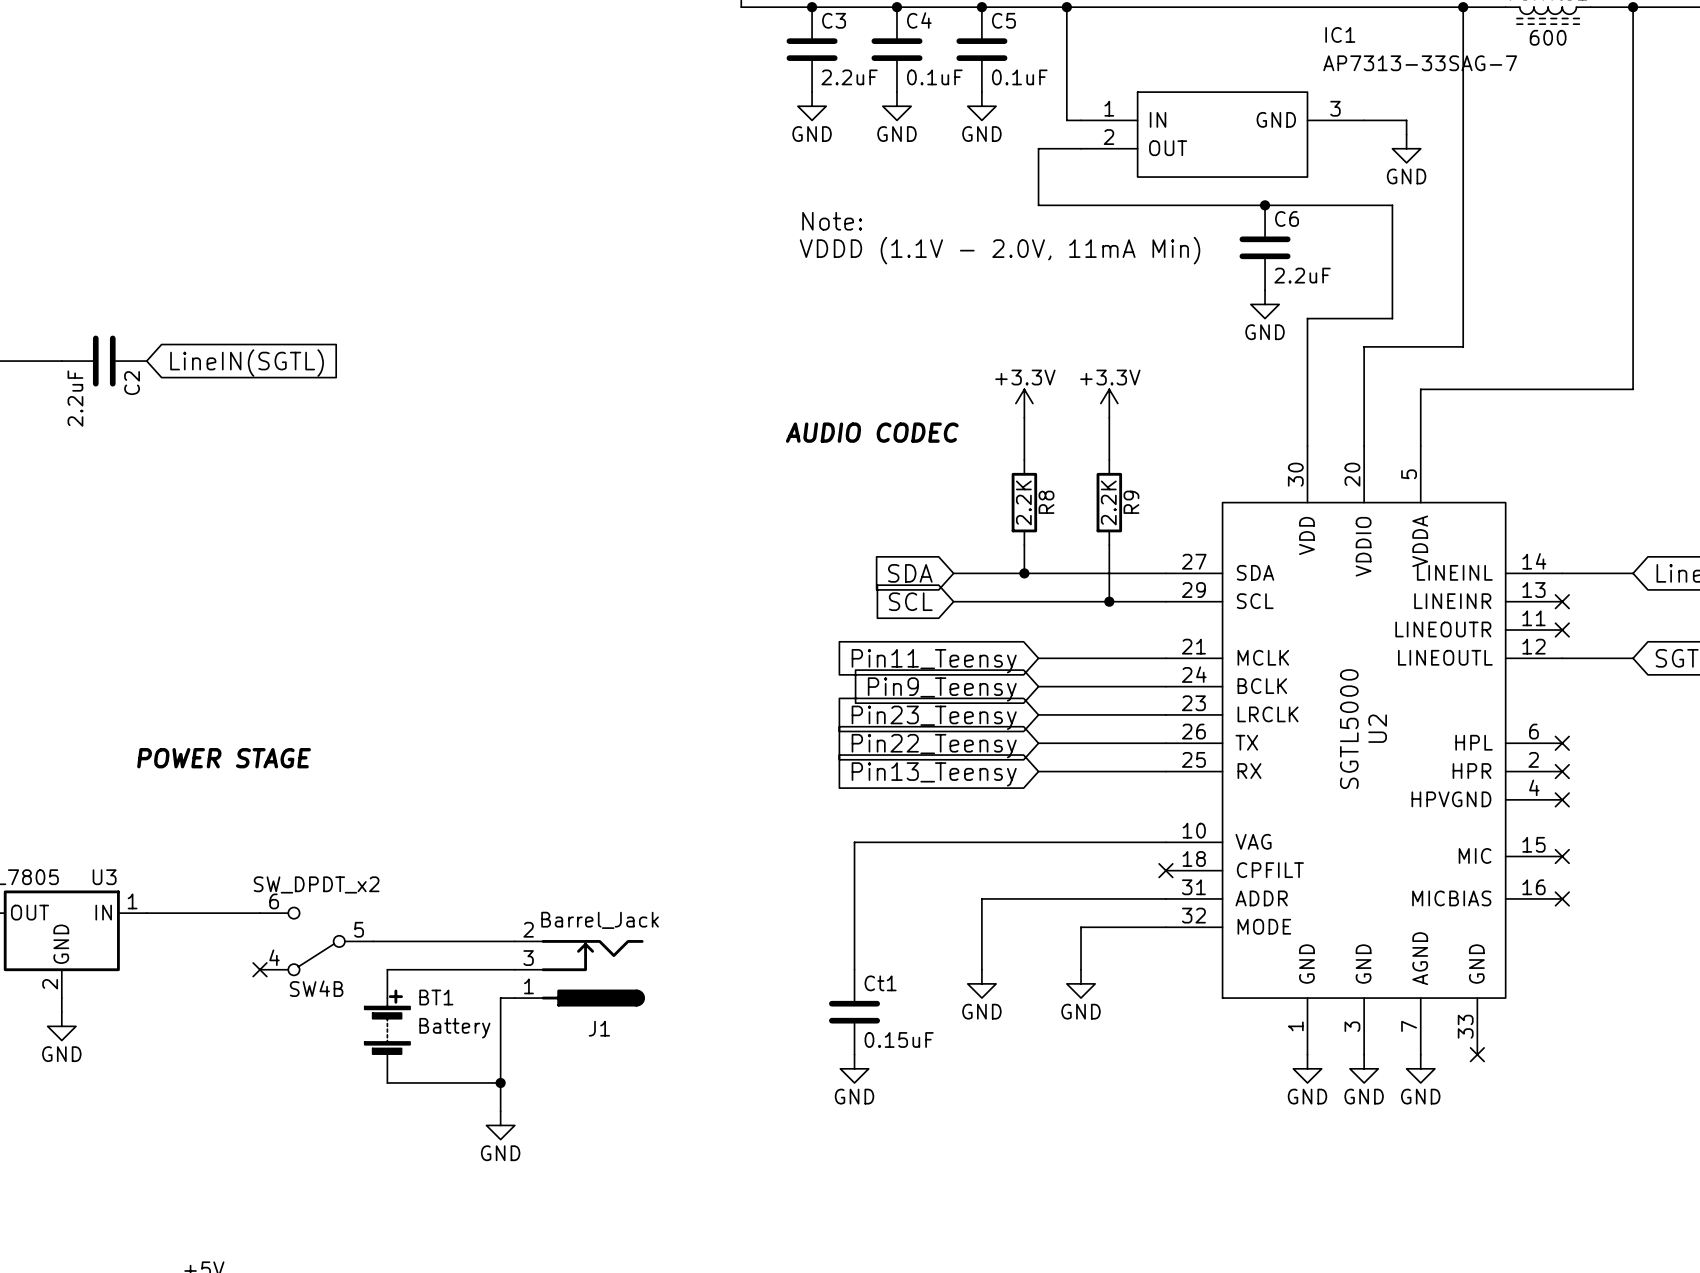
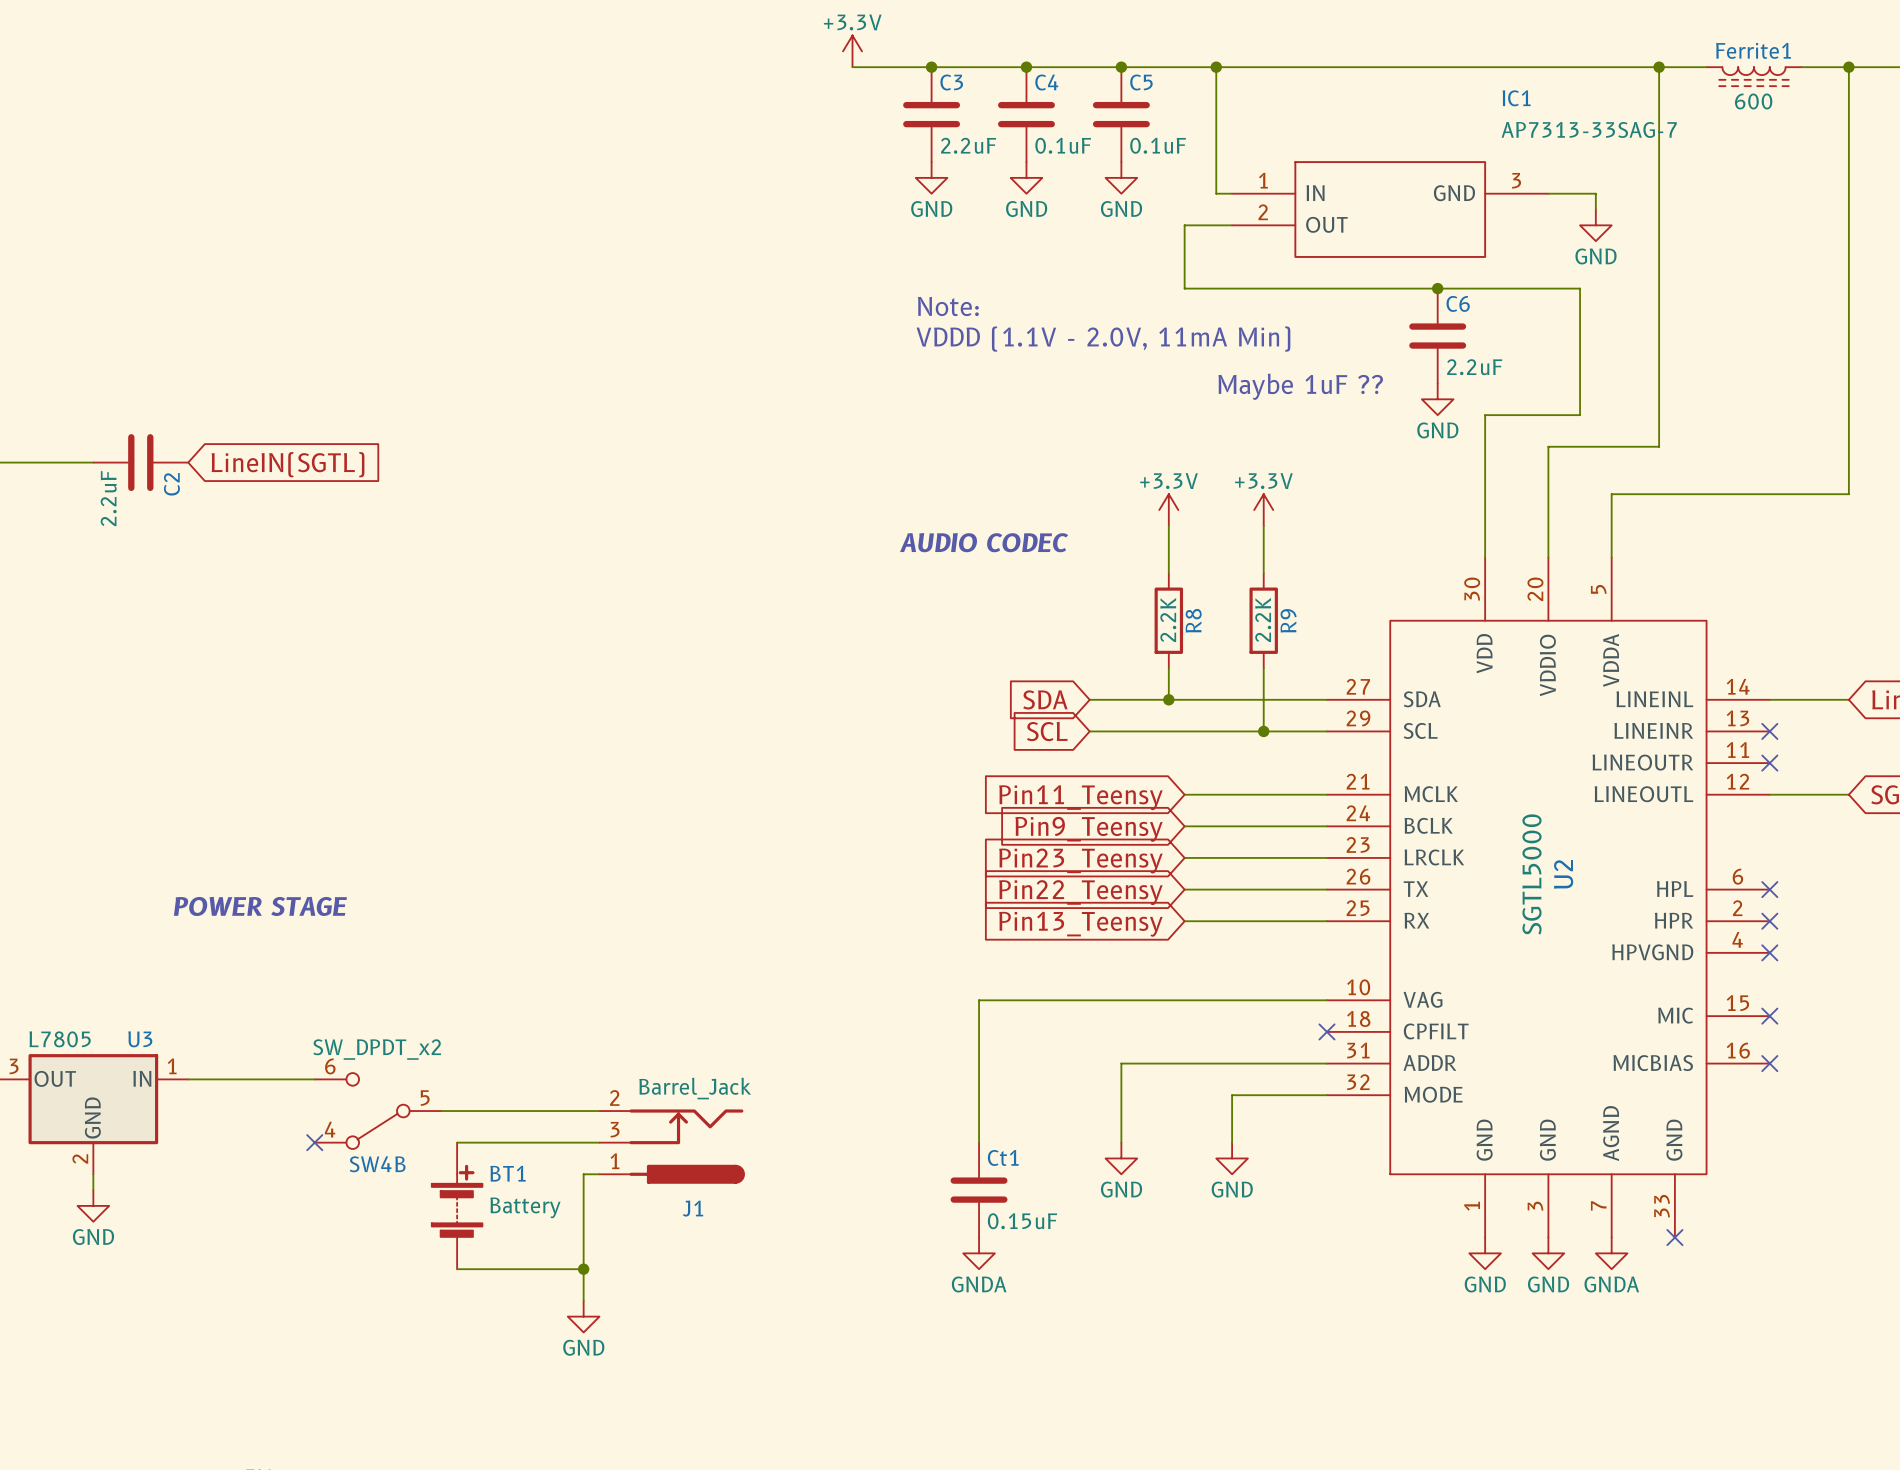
text: none -> Maybe 1uF ?? (1300, 386)
power symbol: GND (854, 1068) -> GNDA (979, 1253)
power symbol: GND (1420, 1068) -> GNDA (1611, 1253)

